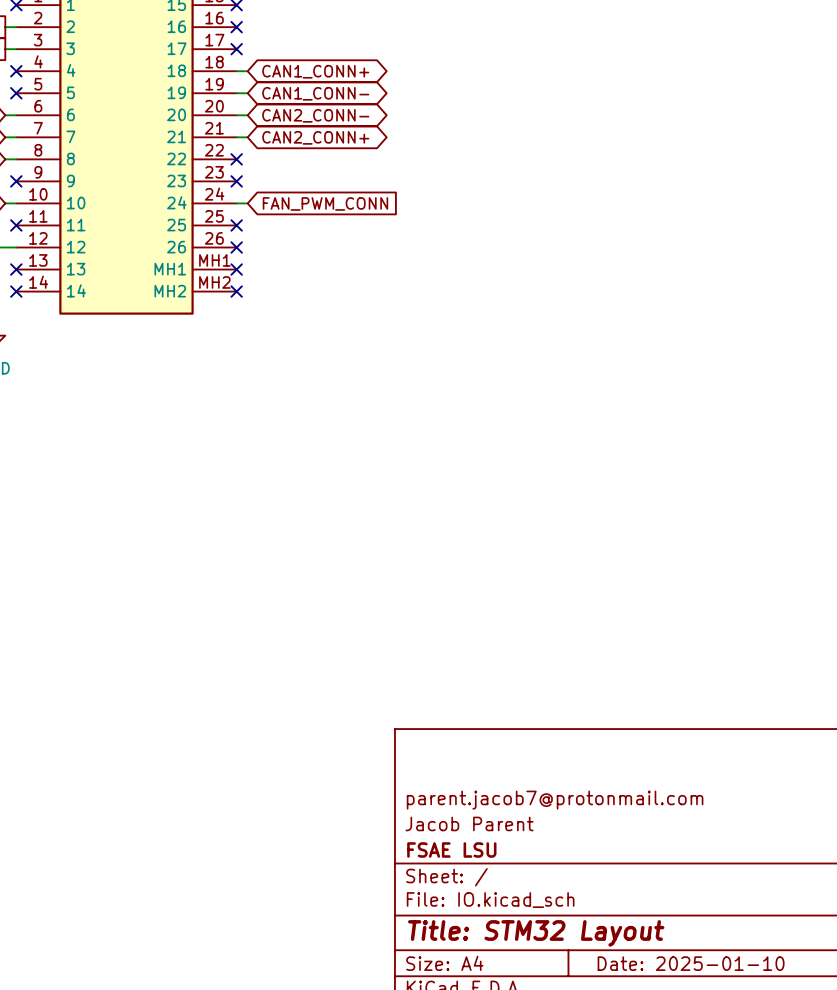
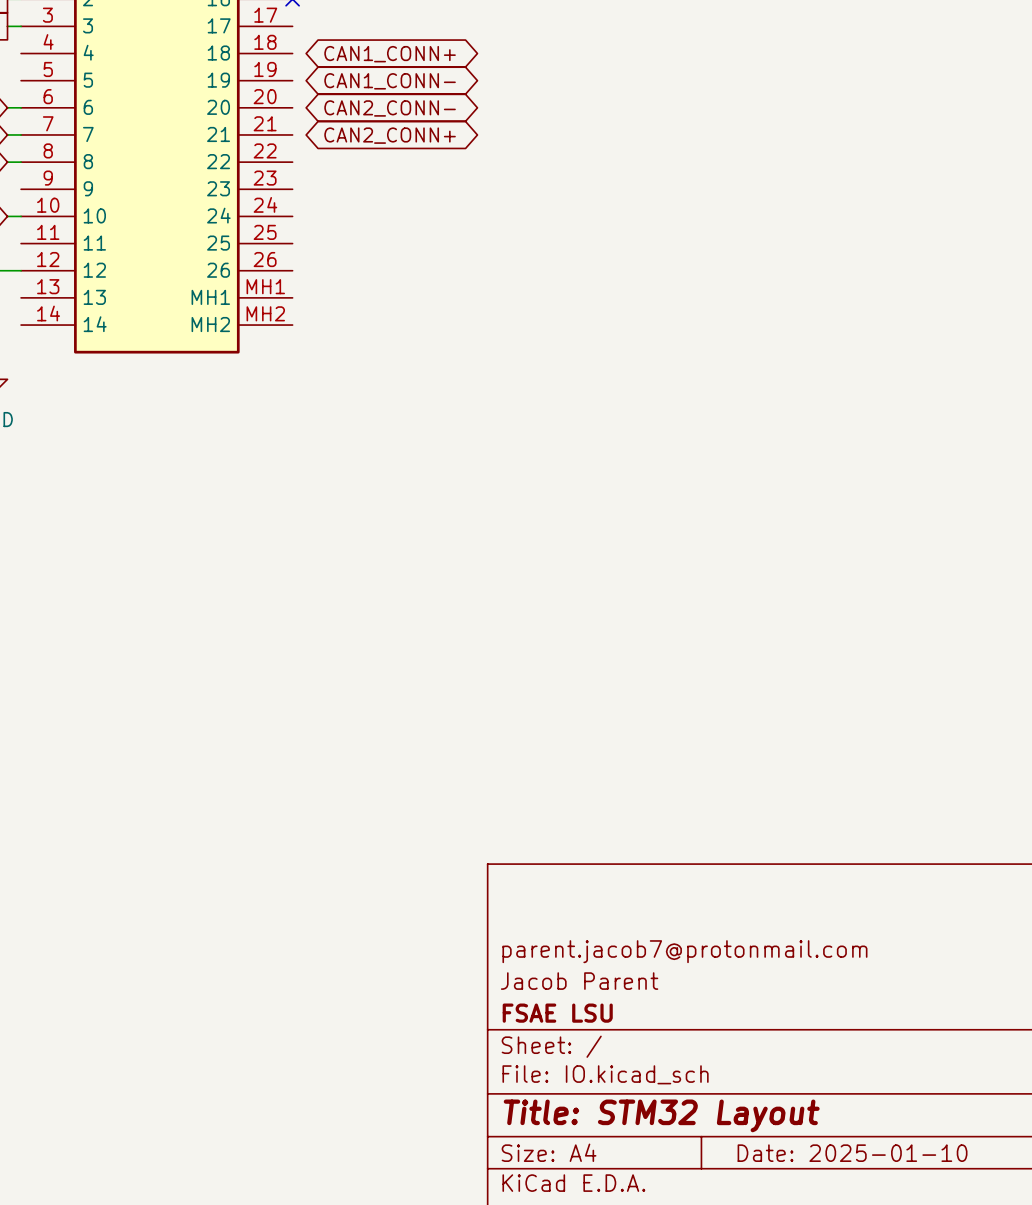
no-connect mark: (236, 49) -> none
no-connect mark: (16, 71) -> none
wire: (236, 71) (247, 71) -> none
no-connect mark: (16, 93) -> none
wire: (236, 93) (247, 93) -> none
wire: (236, 115) (247, 115) -> none
wire: (236, 137) (247, 137) -> none
no-connect mark: (236, 159) -> none
no-connect mark: (16, 181) -> none
no-connect mark: (236, 181) -> none
wire: (236, 203) (247, 203) -> none
global label: FAN_PWM_CONN (325, 203) -> none
no-connect mark: (16, 225) -> none
no-connect mark: (236, 225) -> none
no-connect mark: (236, 247) -> none
no-connect mark: (16, 269) -> none
no-connect mark: (236, 269) -> none
no-connect mark: (16, 291) -> none
no-connect mark: (236, 291) -> none

